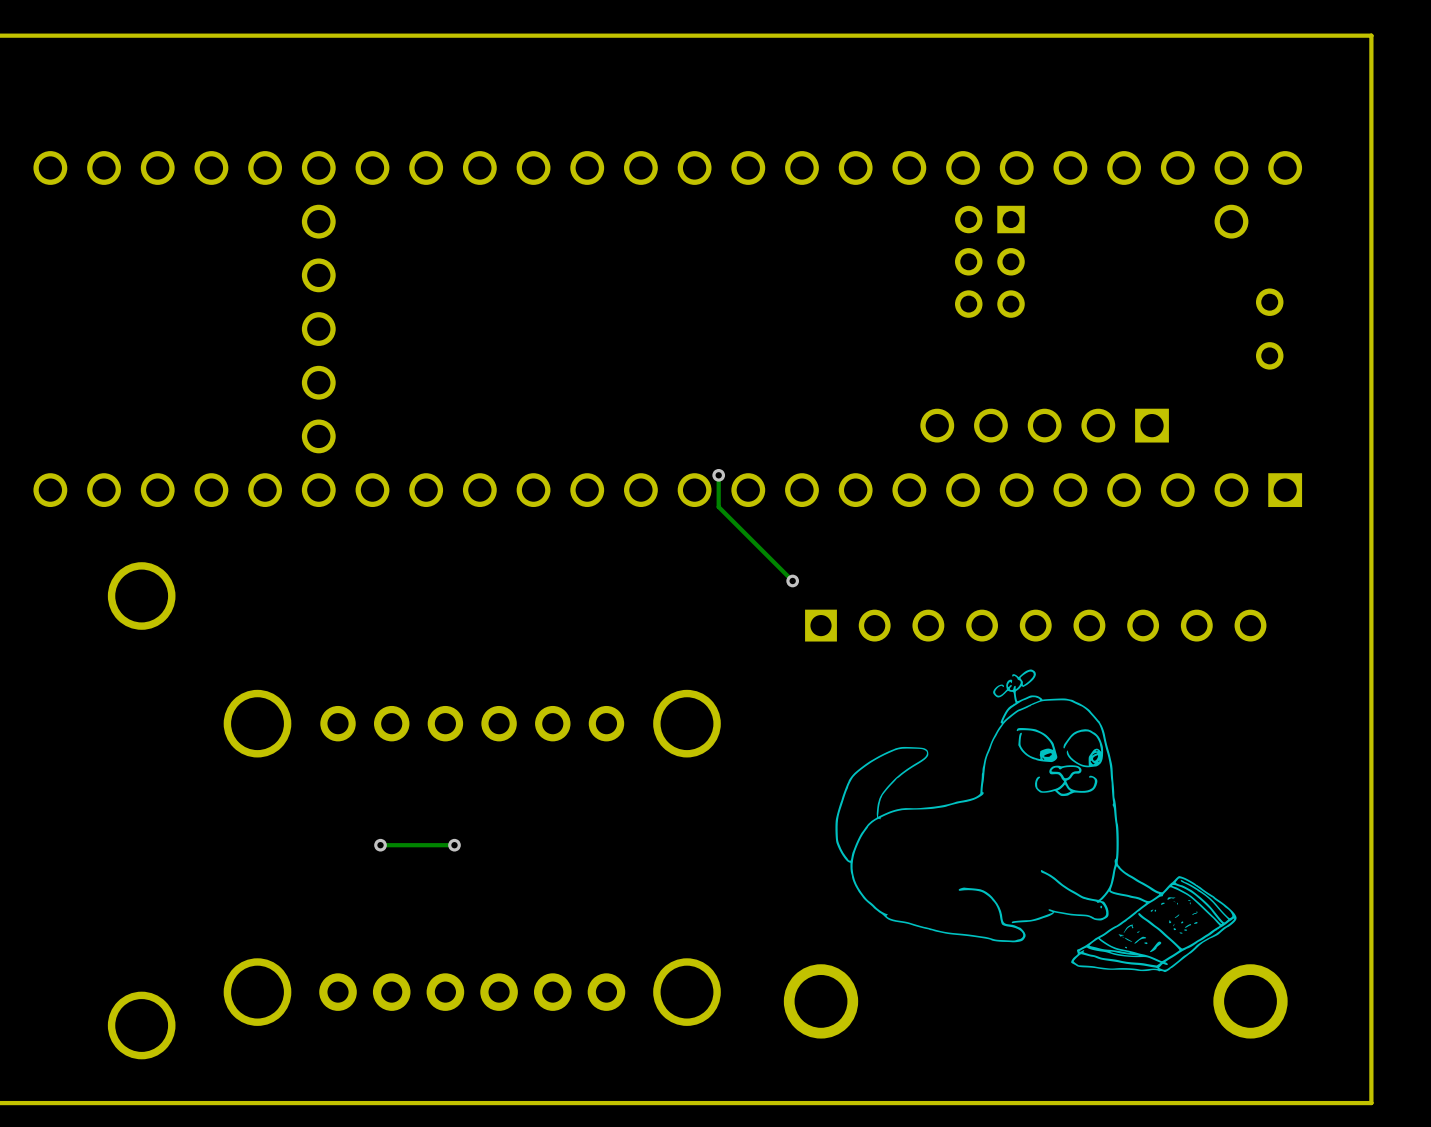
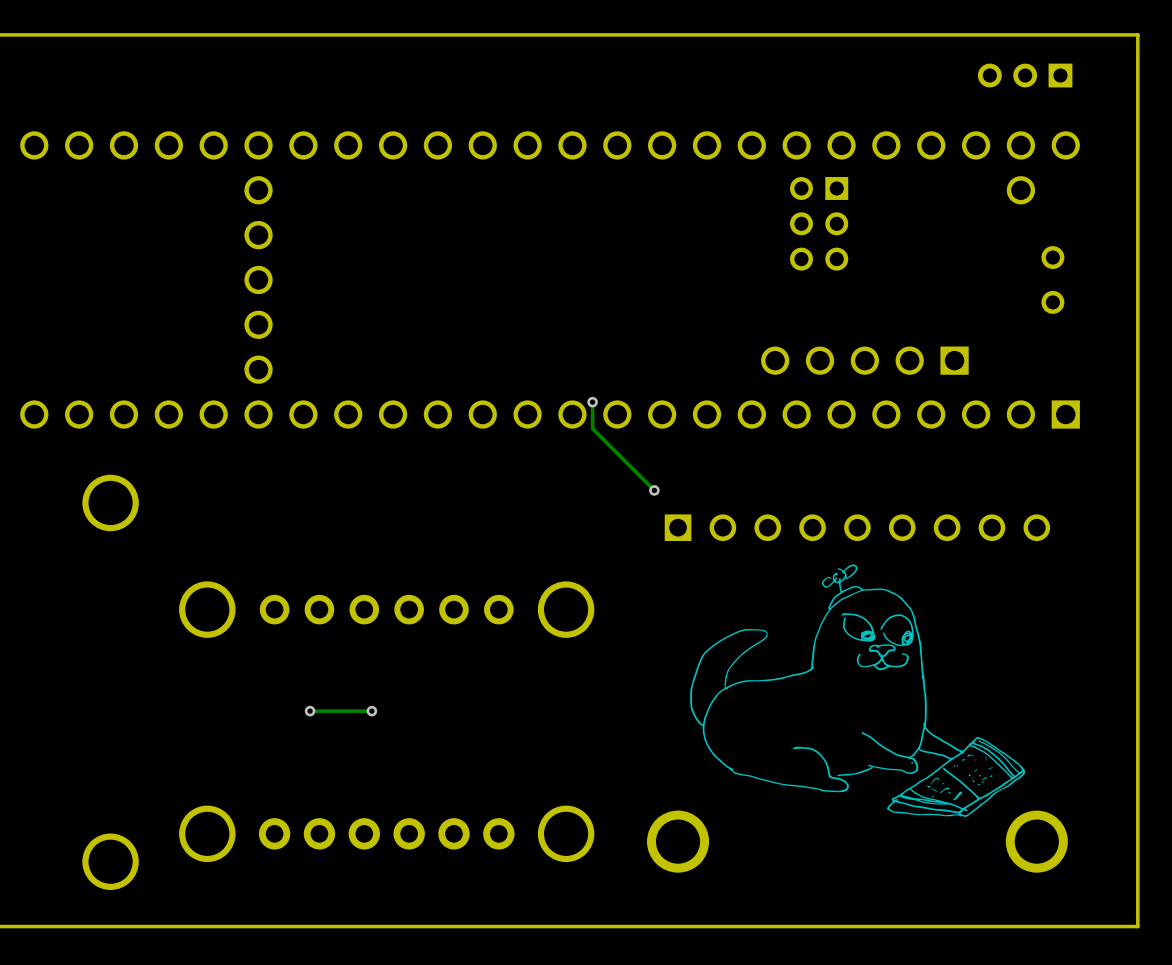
part: none -> (1025, 75)

